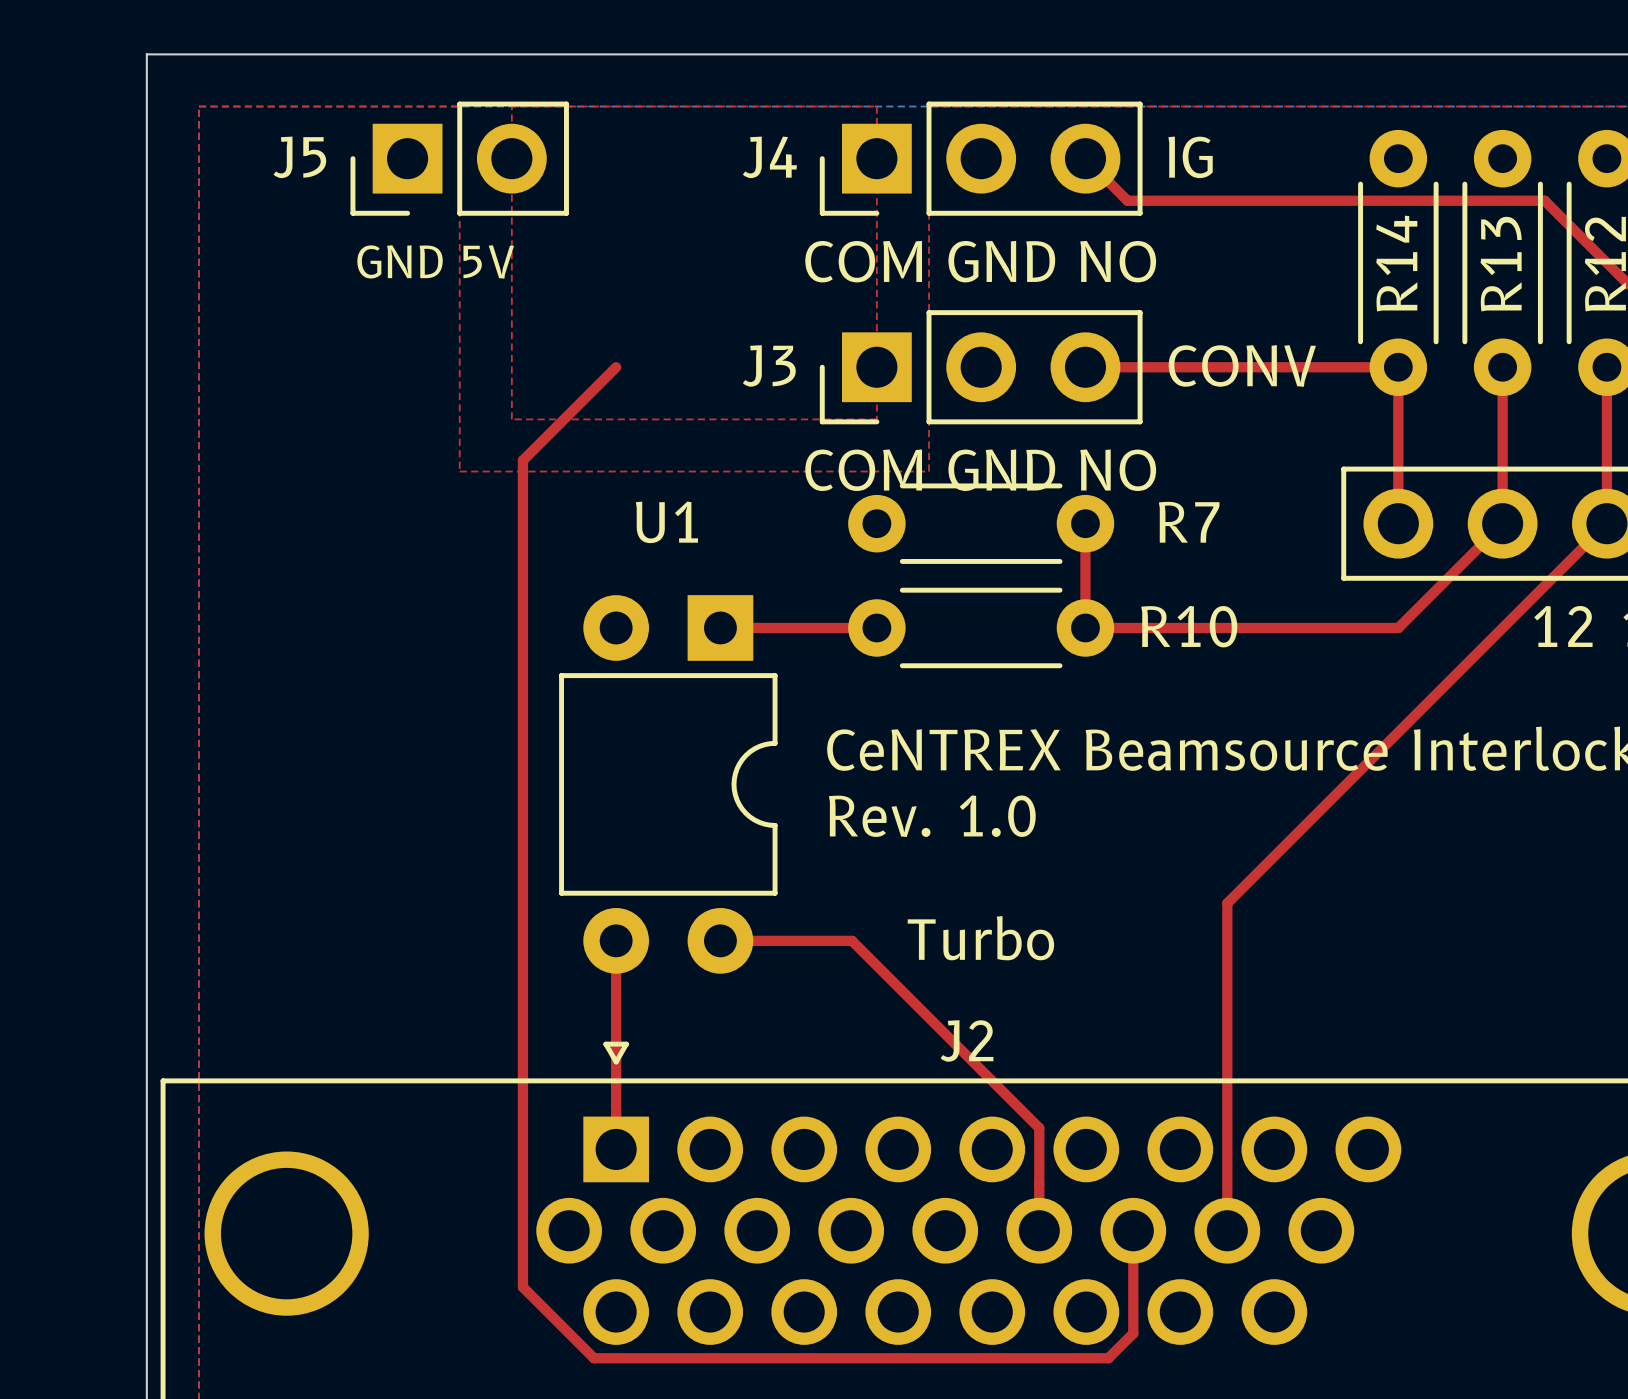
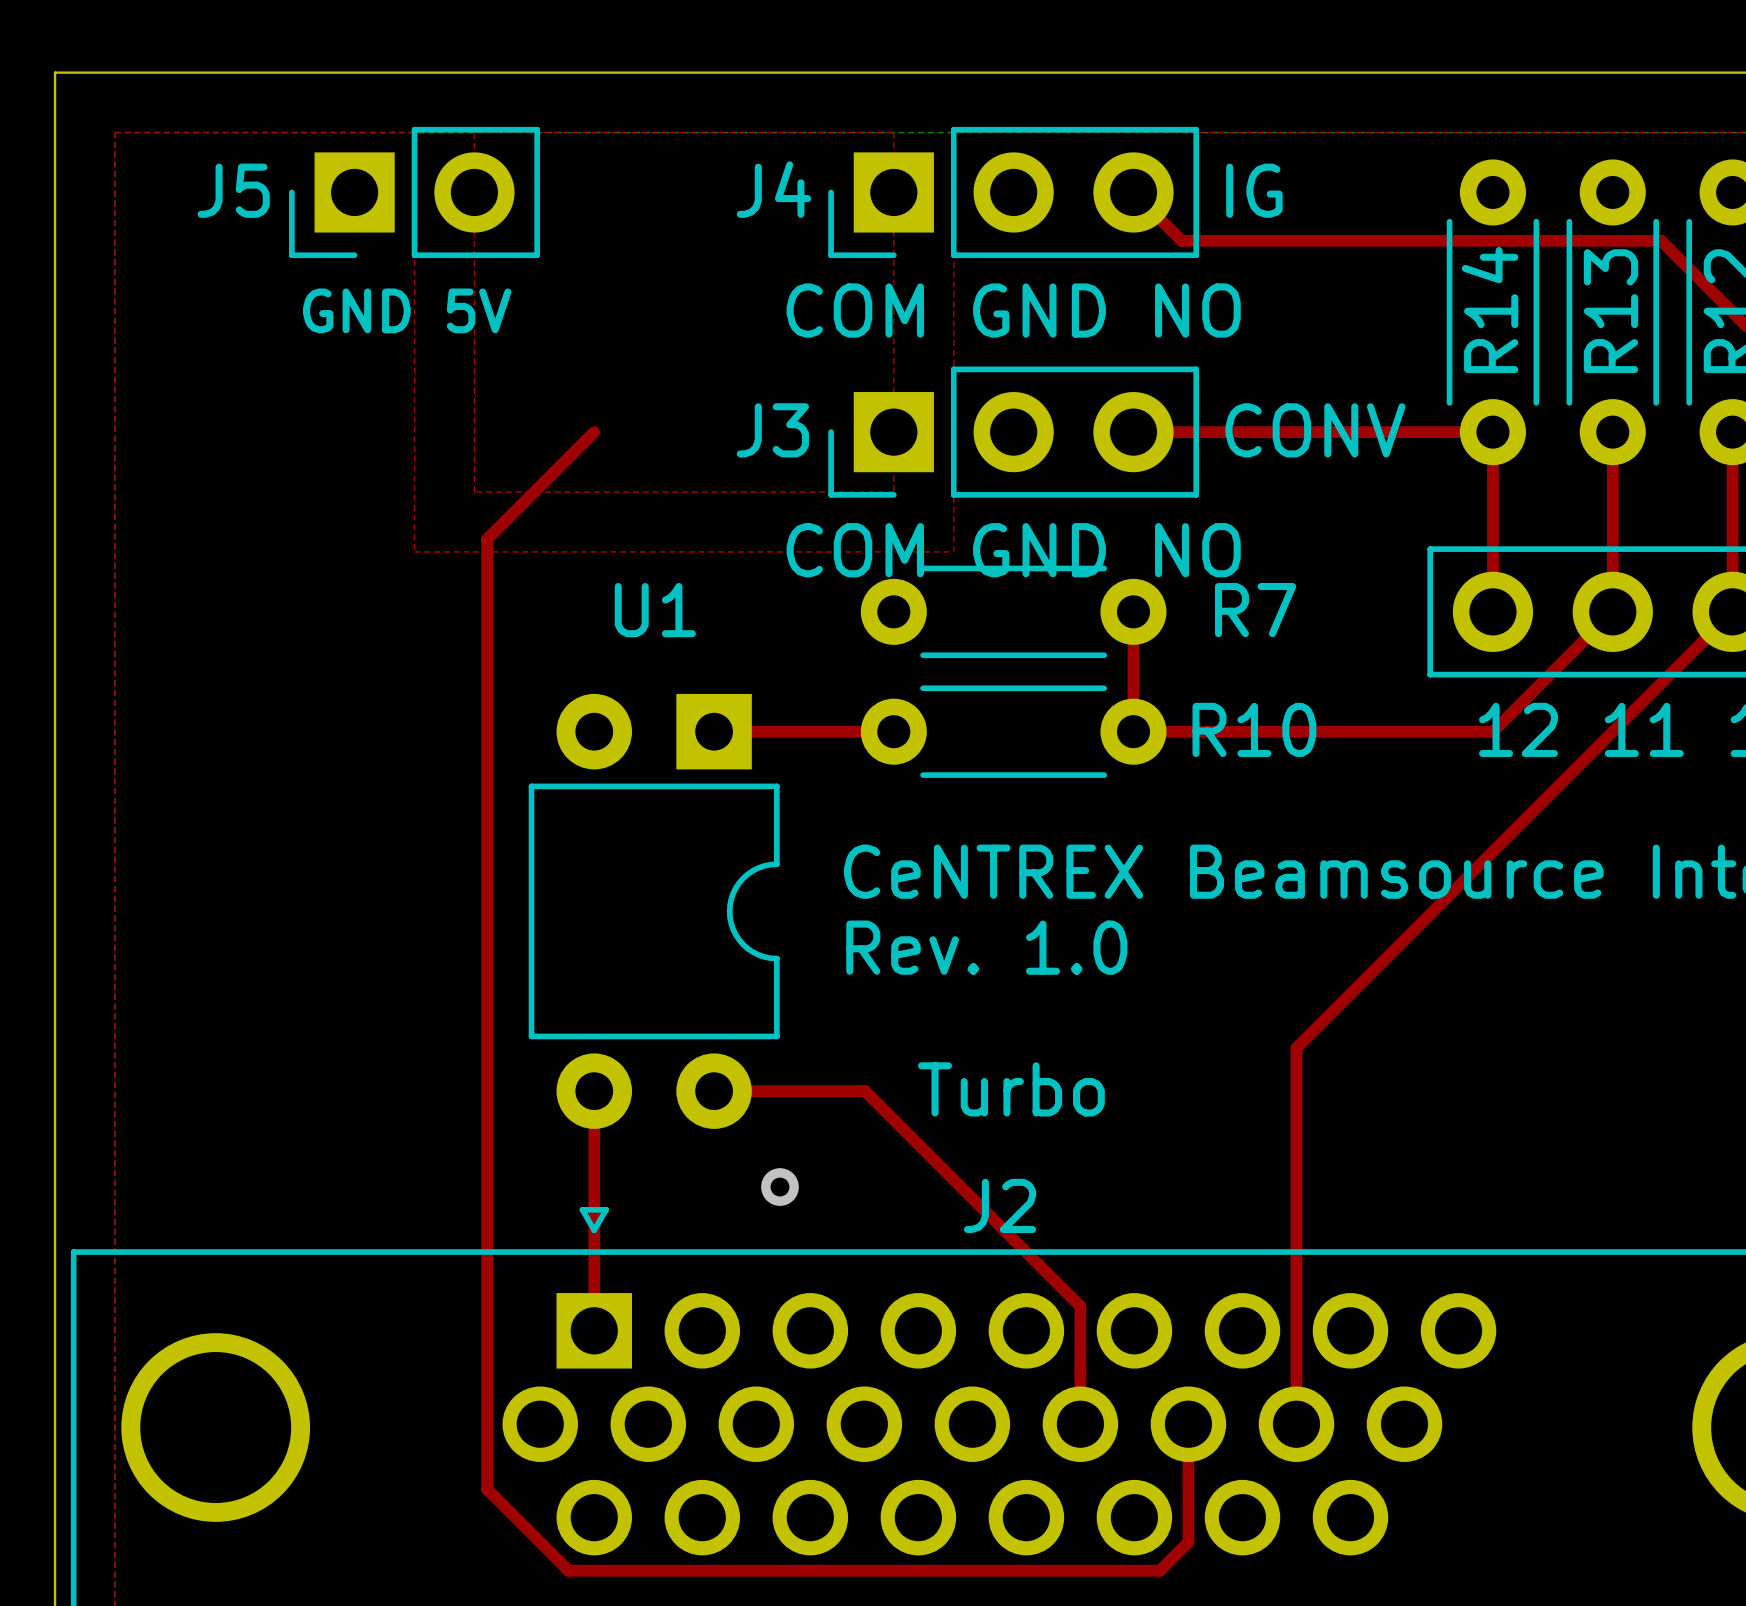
via: none -> (779, 1187)

